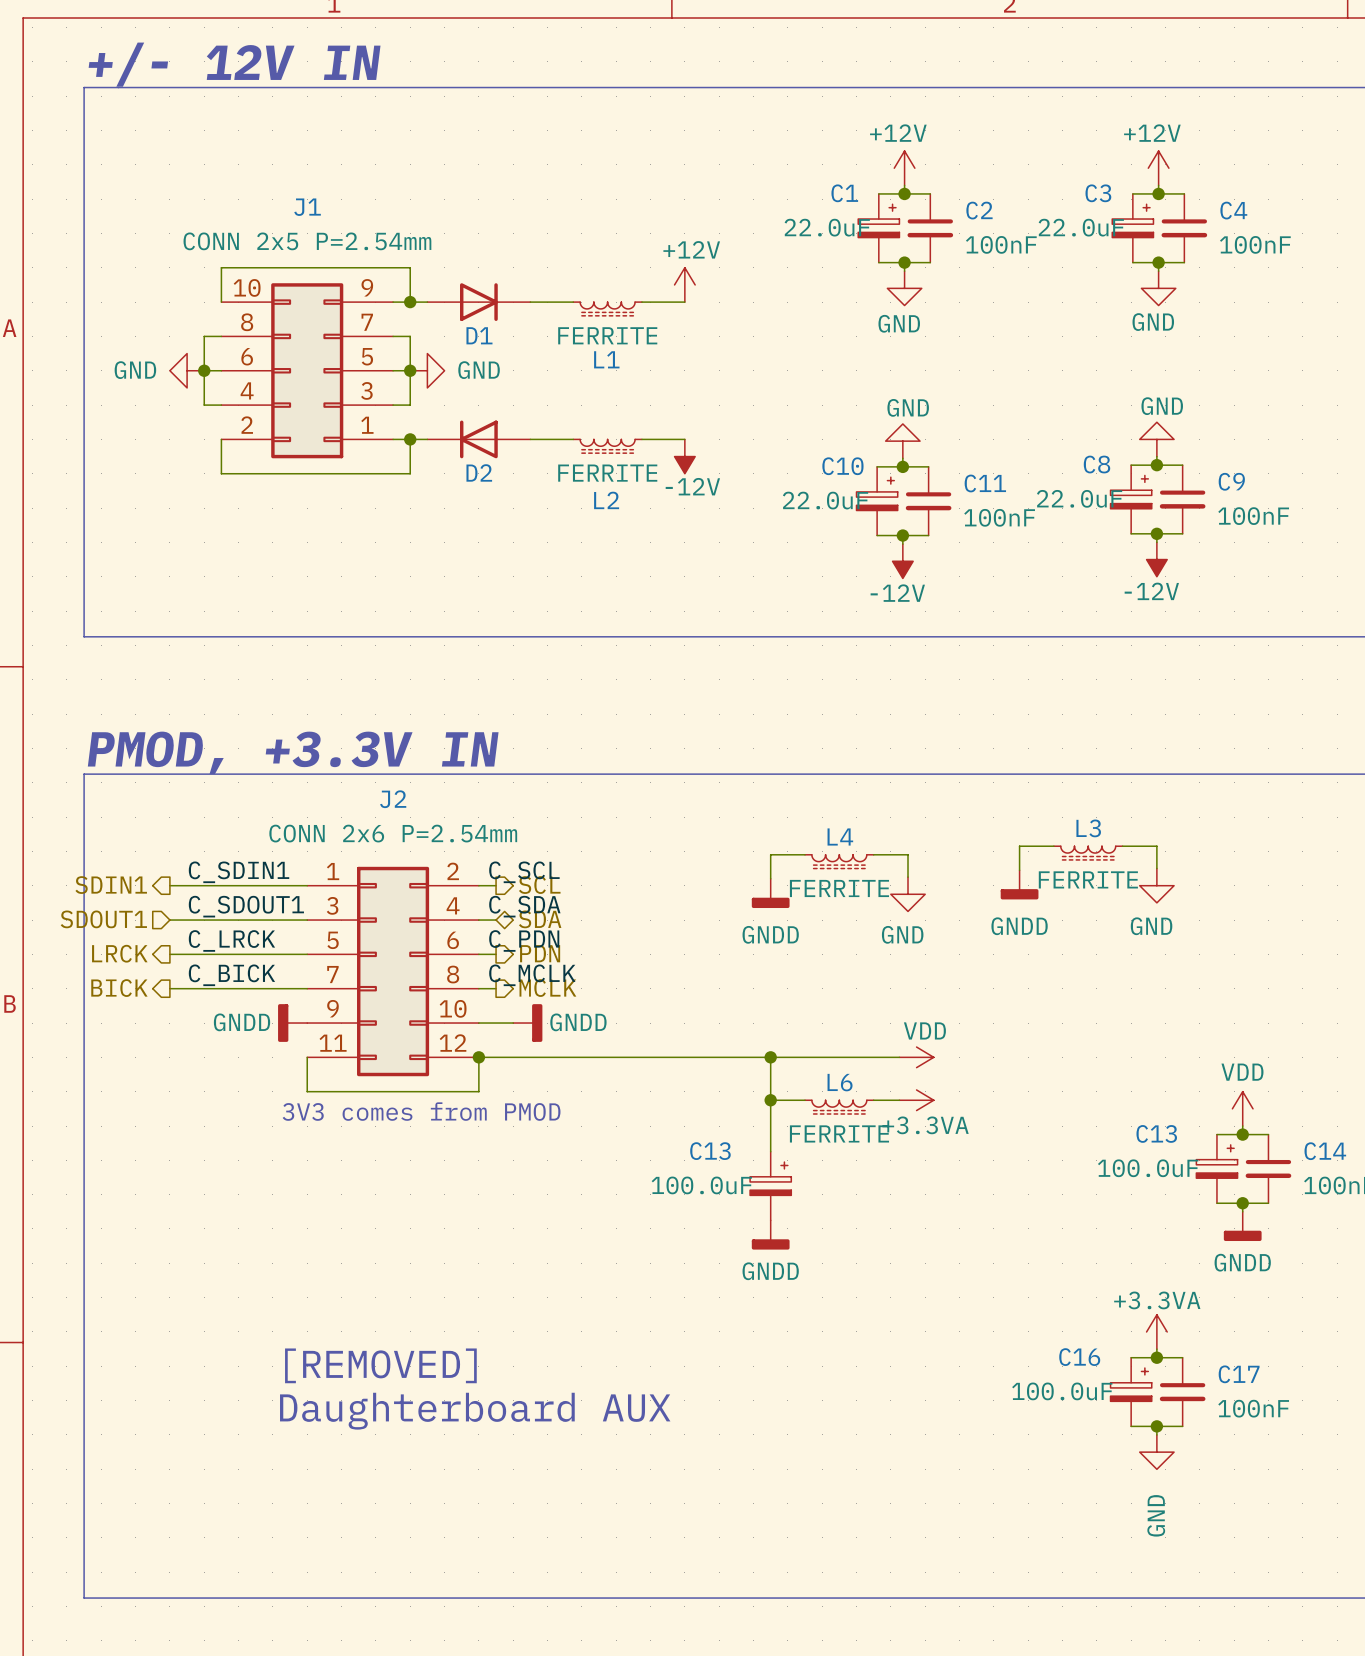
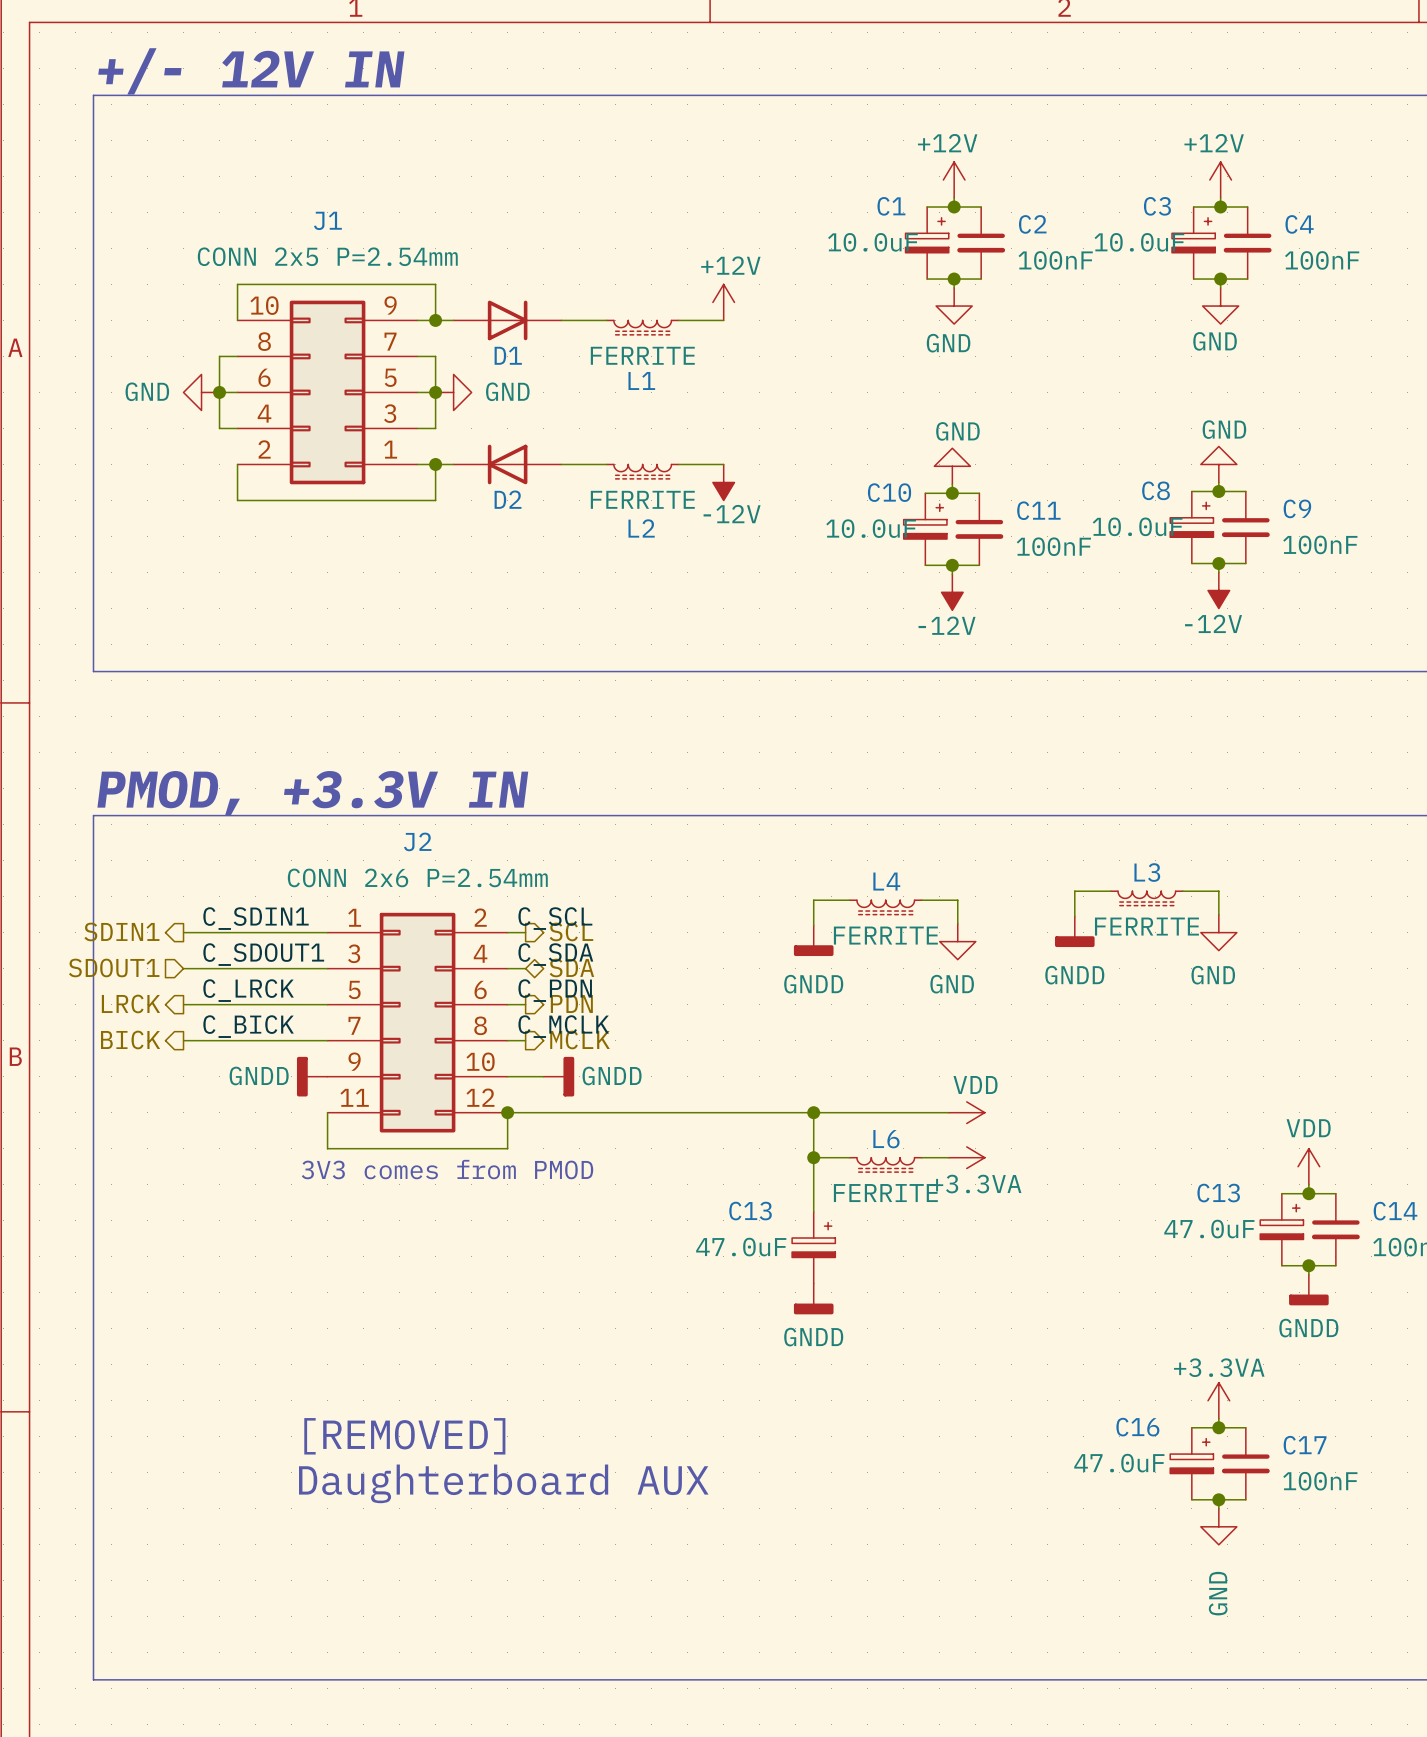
C1 value: 22.0uF (827, 227) -> 10.0uF (872, 242)
C3 value: 22.0uF (1081, 227) -> 10.0uF (1139, 242)
C8 value: 22.0uF (1079, 498) -> 10.0uF (1137, 526)
C10 value: 22.0uF (825, 500) -> 10.0uF (871, 528)
C13 value: 100.0uF (1148, 1168) -> 47.0uF (1209, 1229)
C13 value: 100.0uF (701, 1185) -> 47.0uF (741, 1247)
C16 value: 100.0uF (1062, 1391) -> 47.0uF (1119, 1463)

